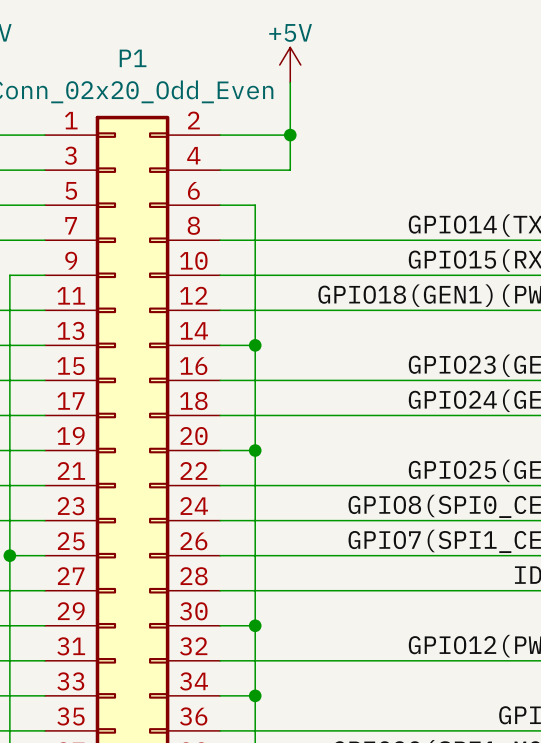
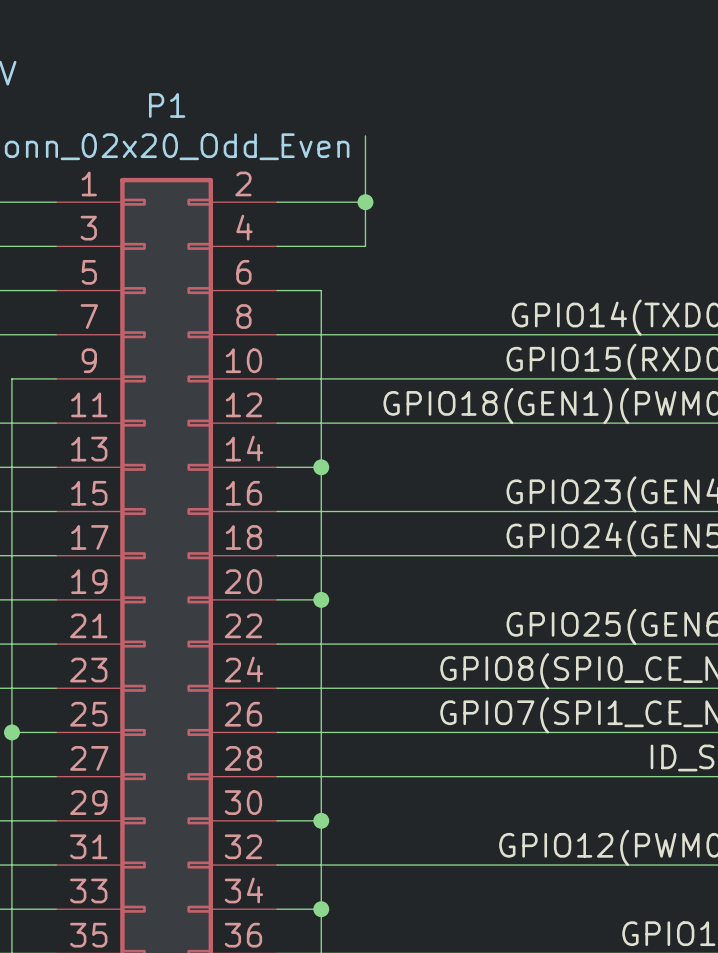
power symbol: +5V (290, 64) -> none

